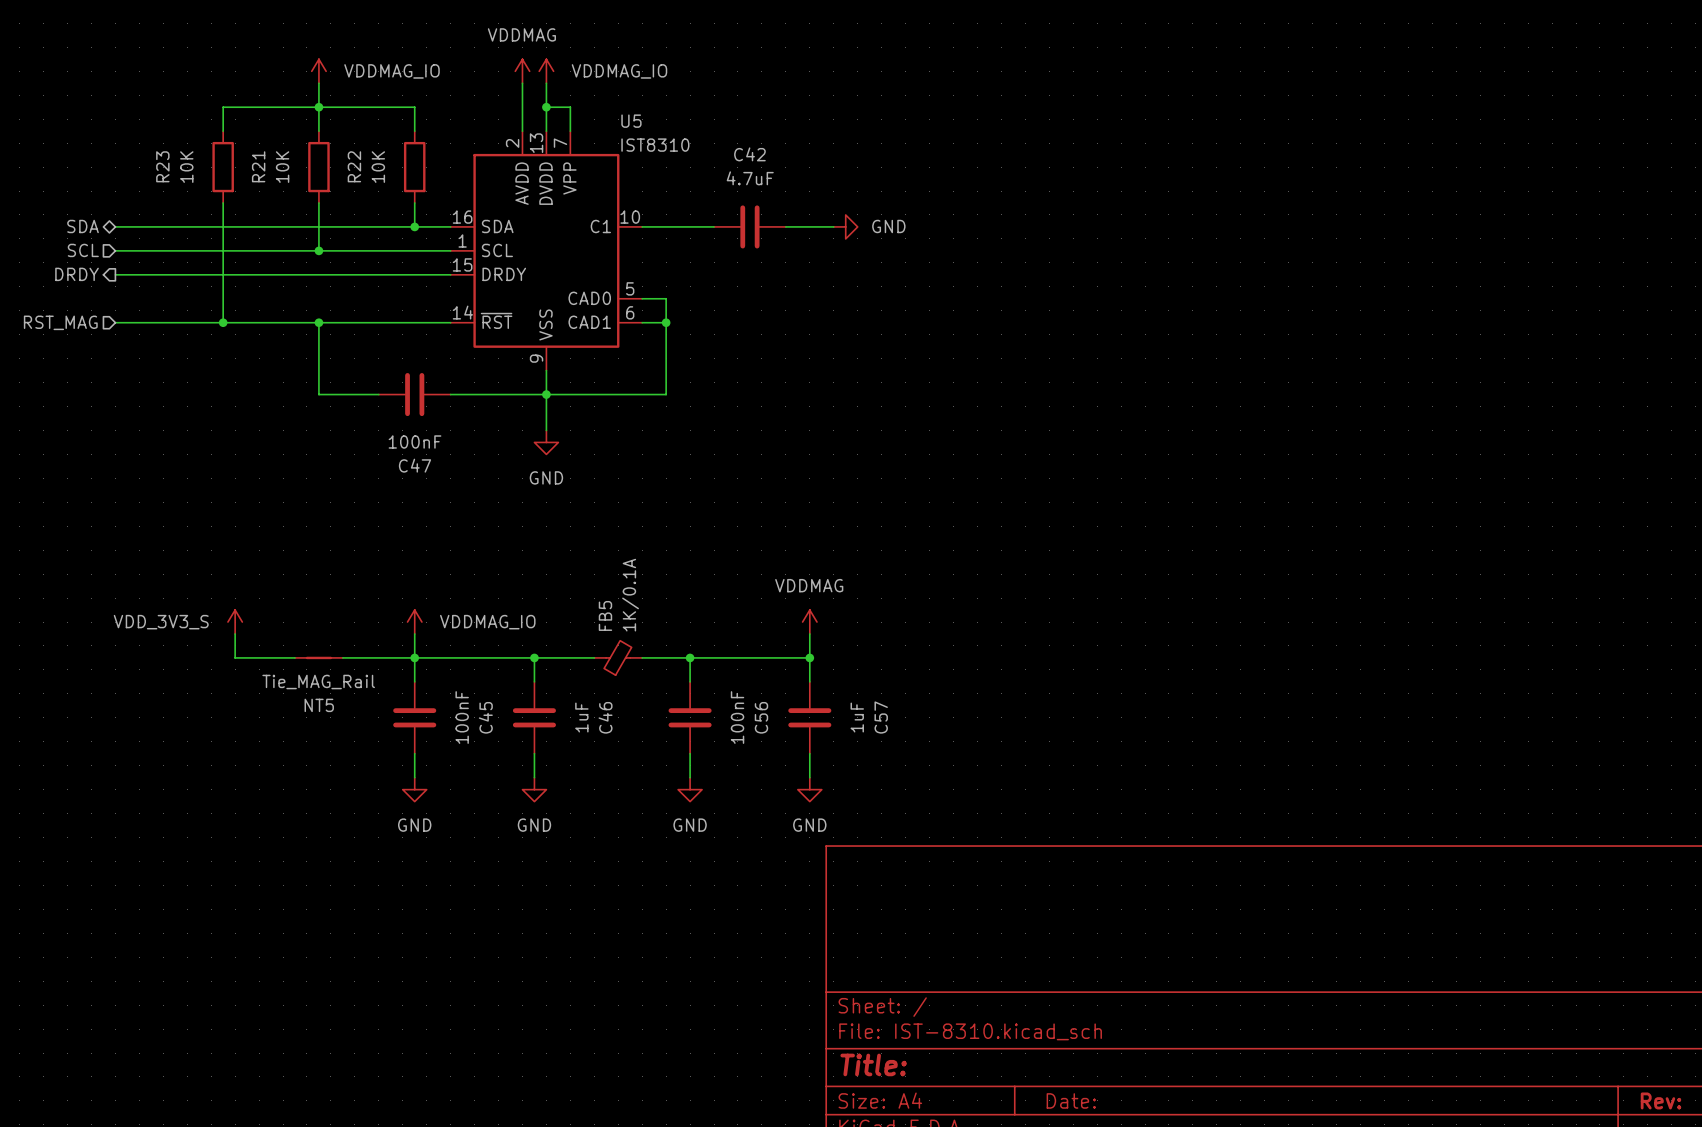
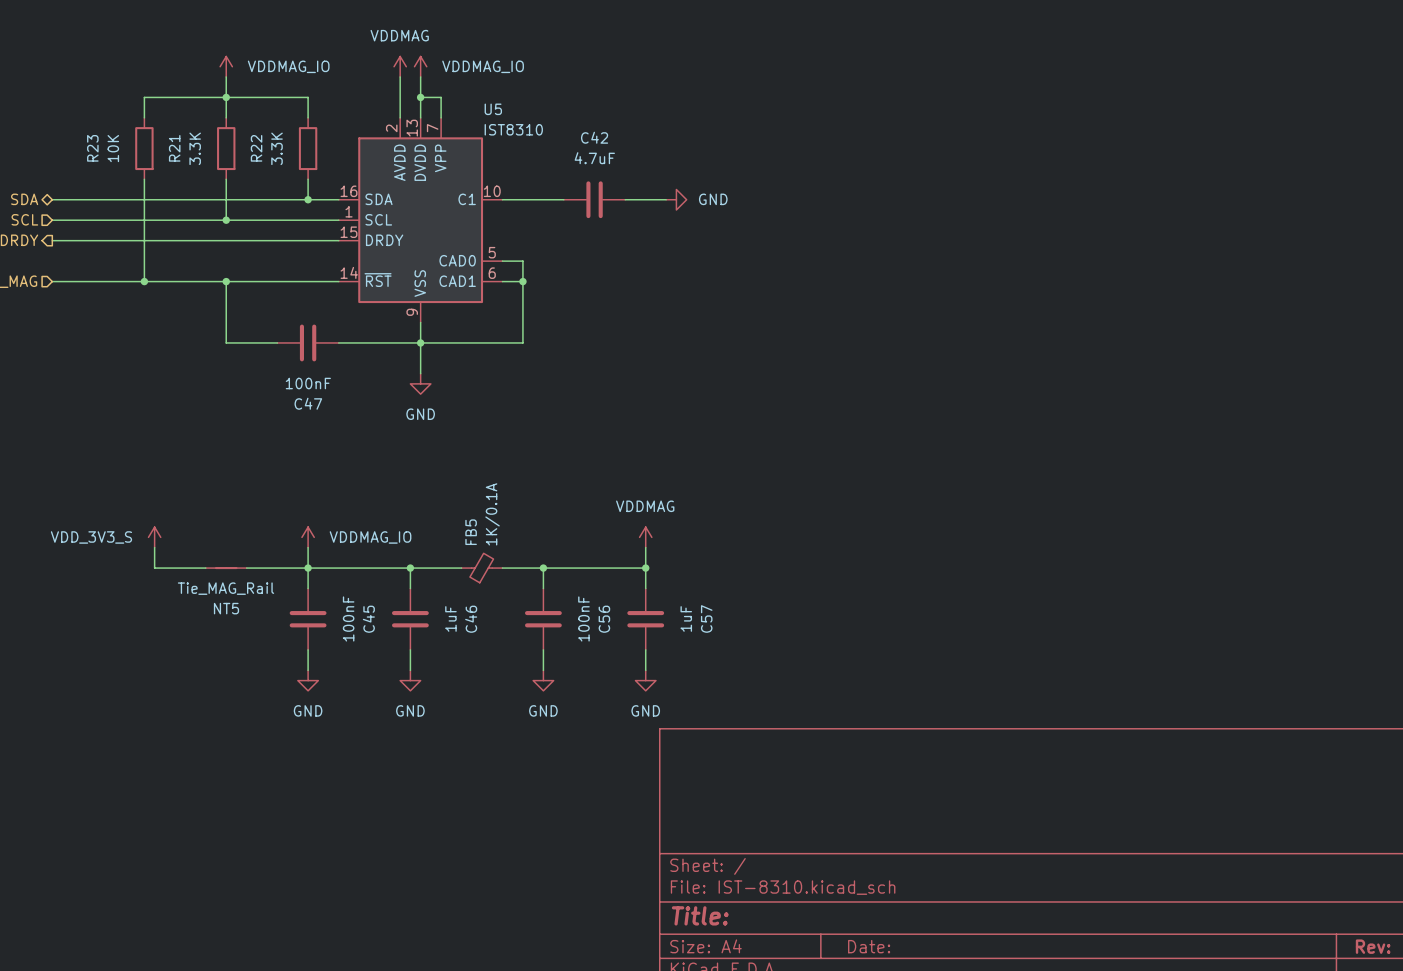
R21 value: 10K (282, 167) -> 3.3K (195, 148)
R22 value: 10K (378, 167) -> 3.3K (277, 148)

